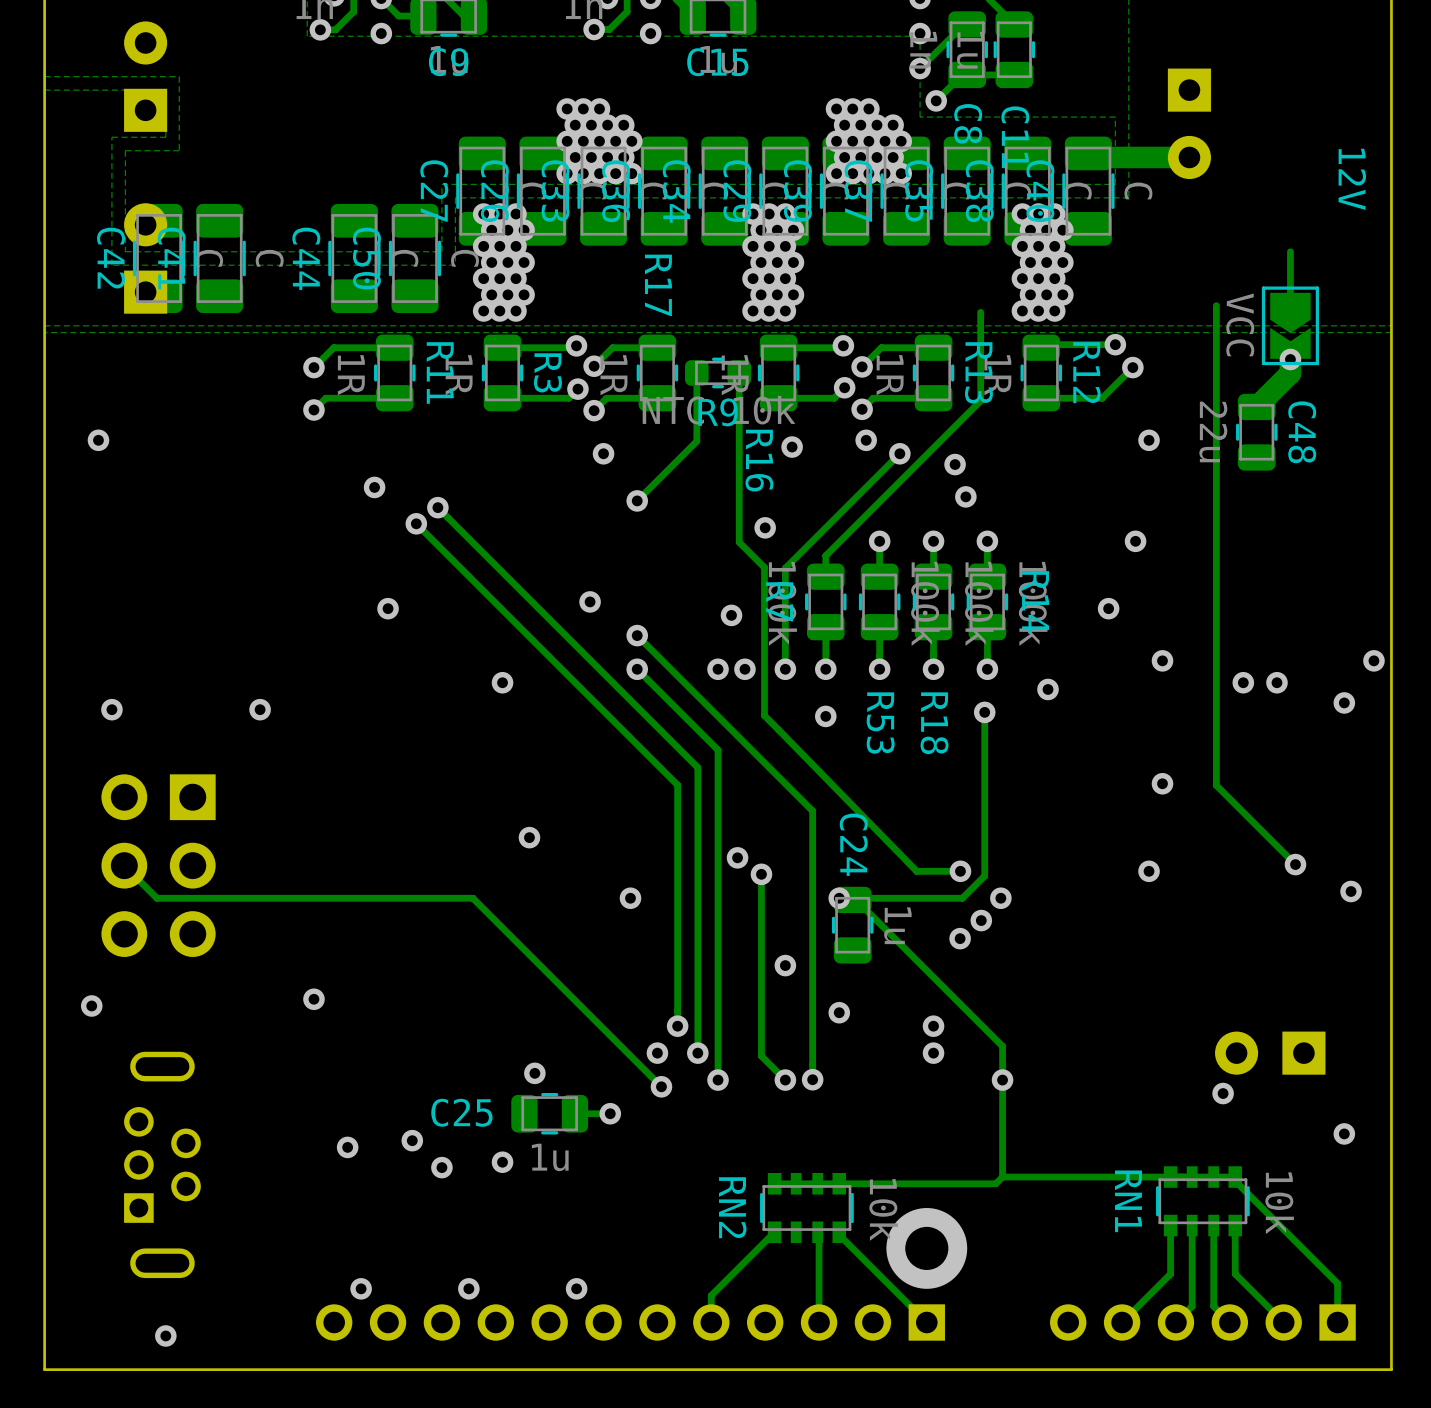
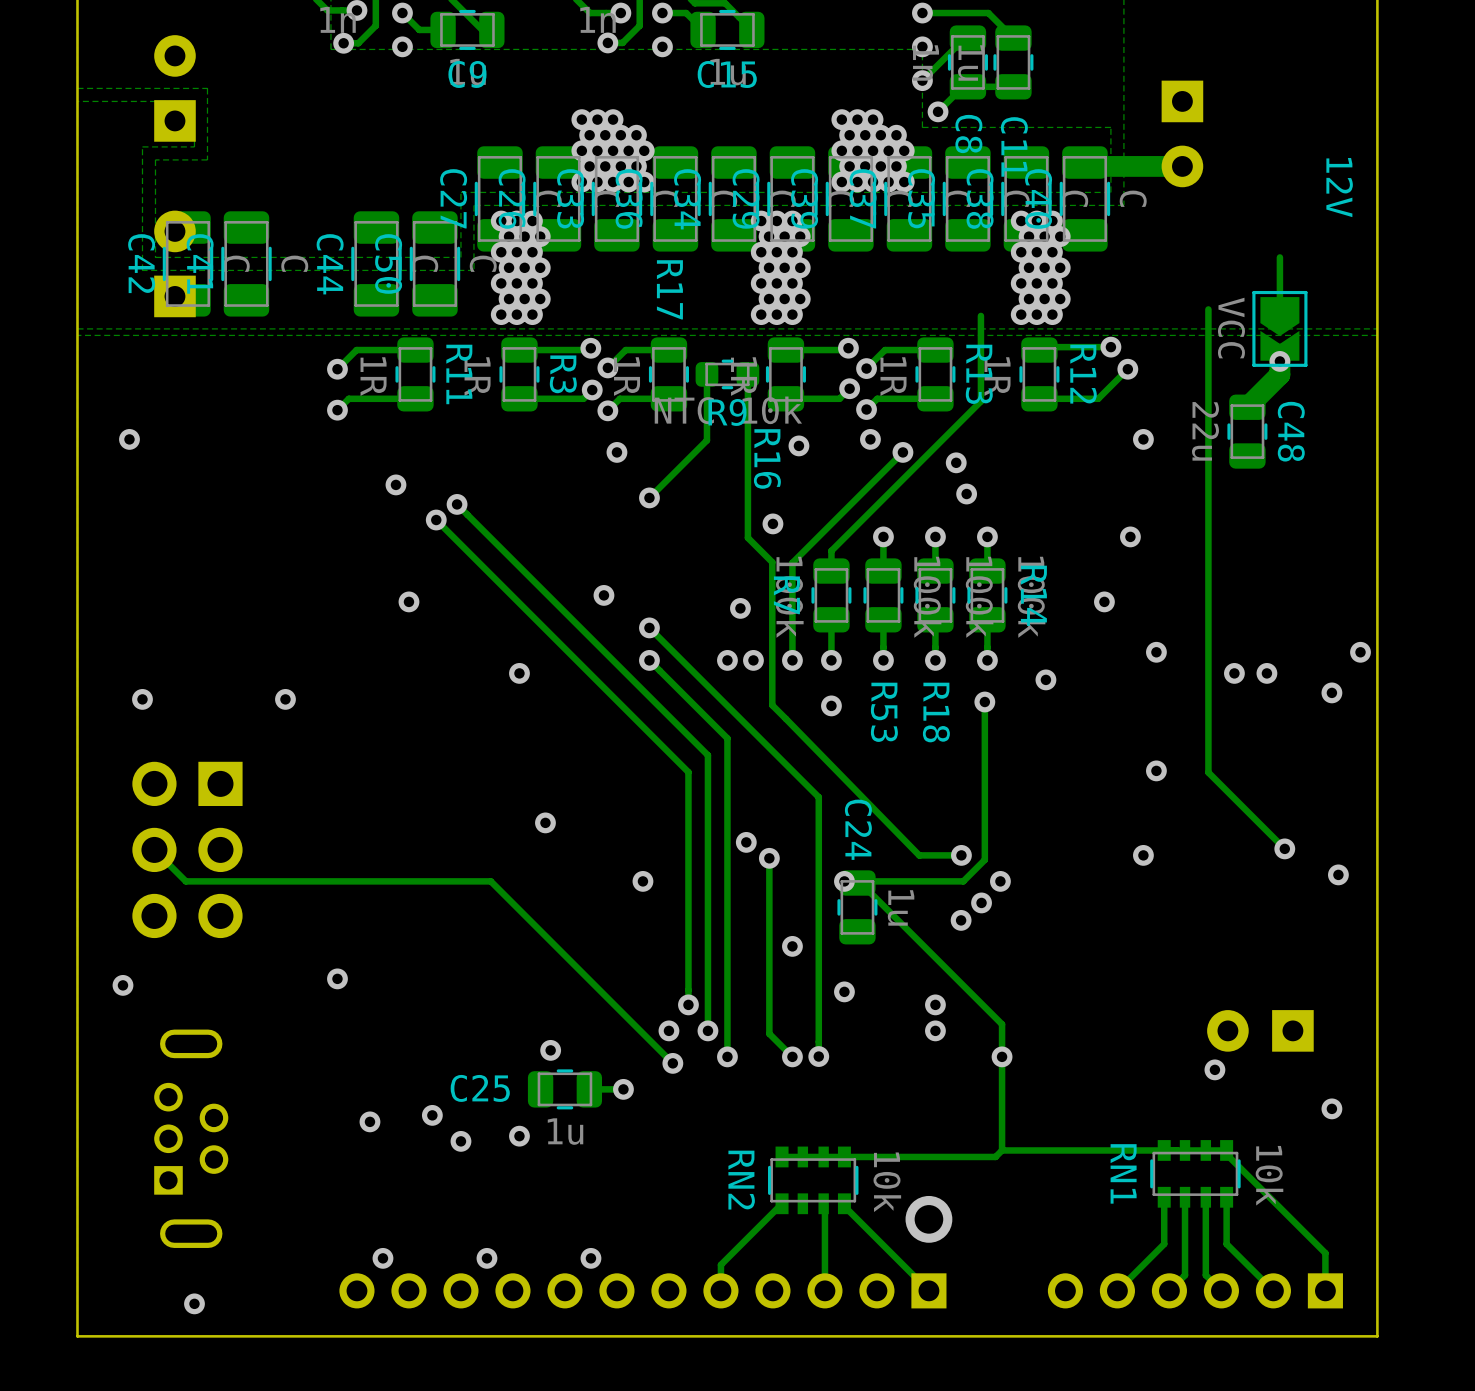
via size: [886, 1208, 968, 1289] -> [905, 1195, 953, 1243]

